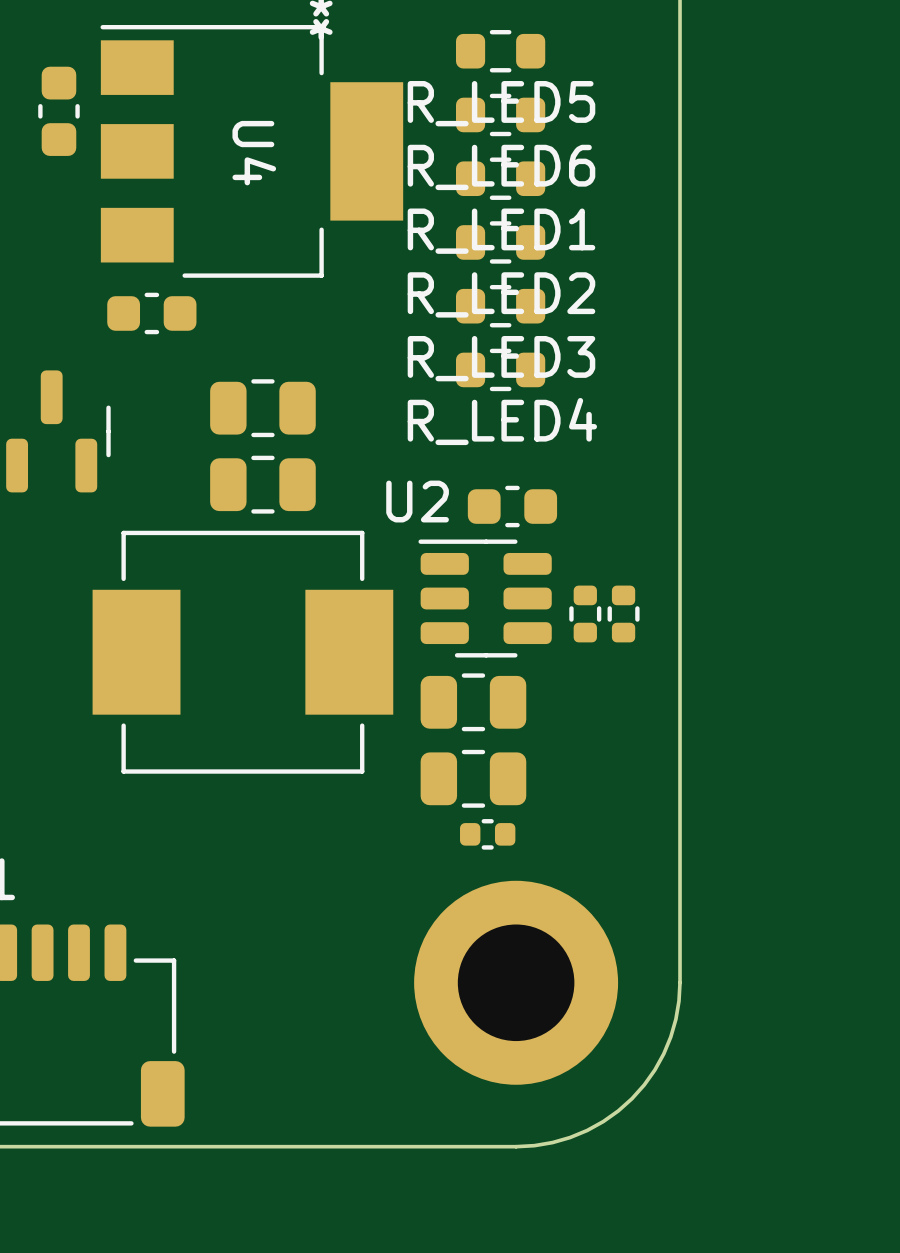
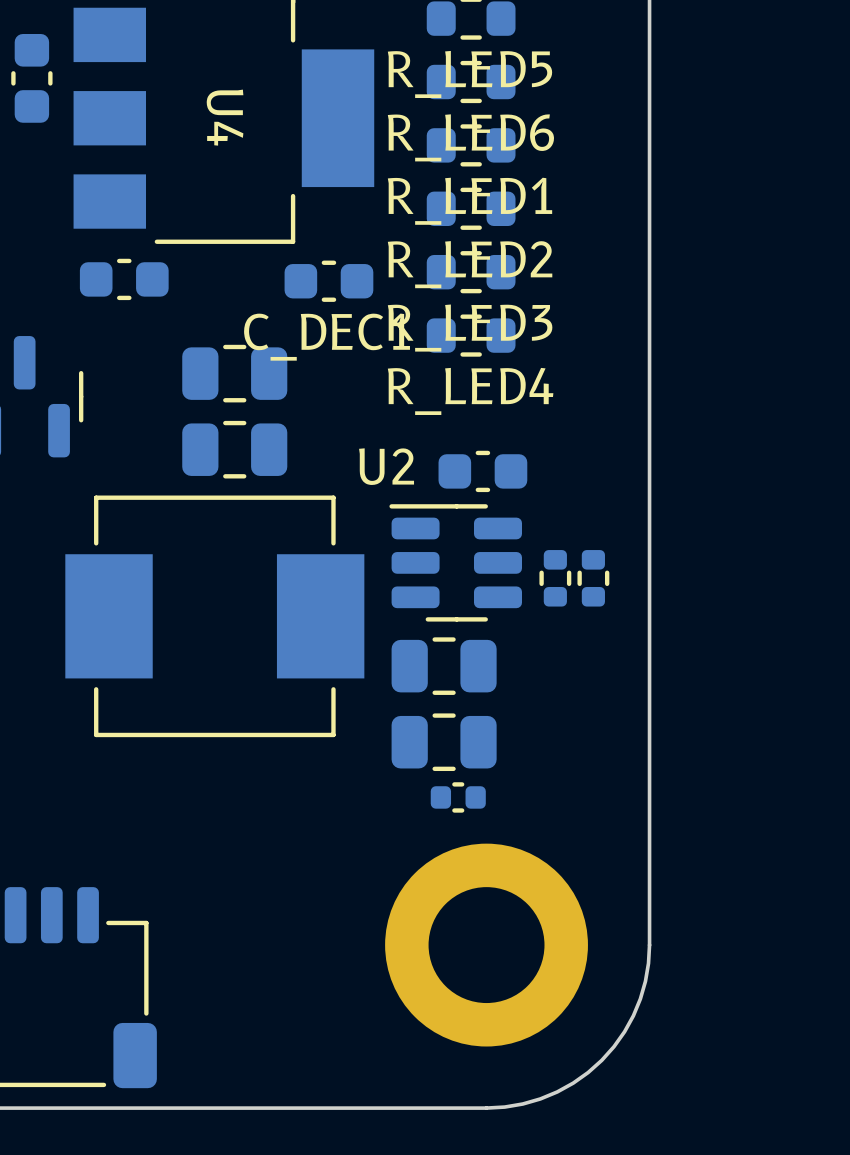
C_DEC1: none -> (328, 281)

